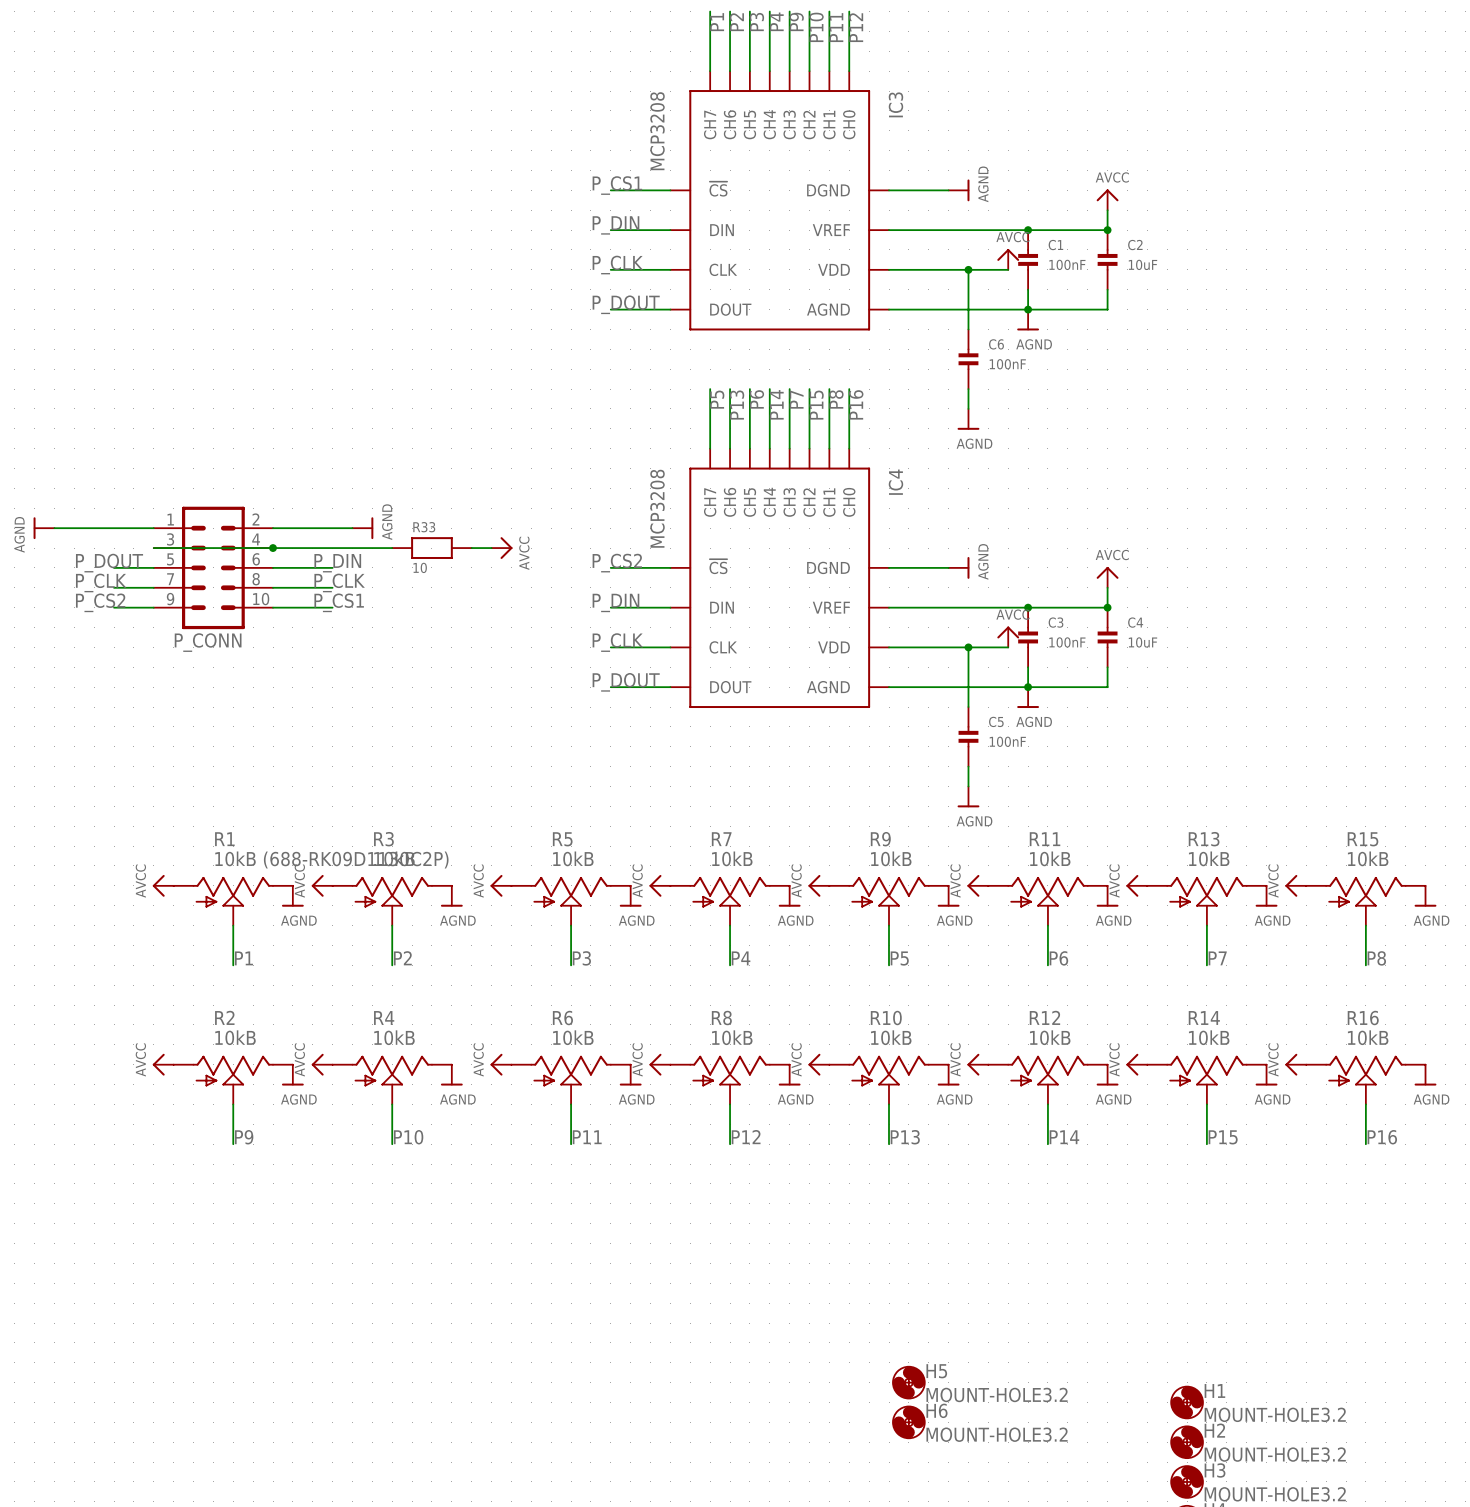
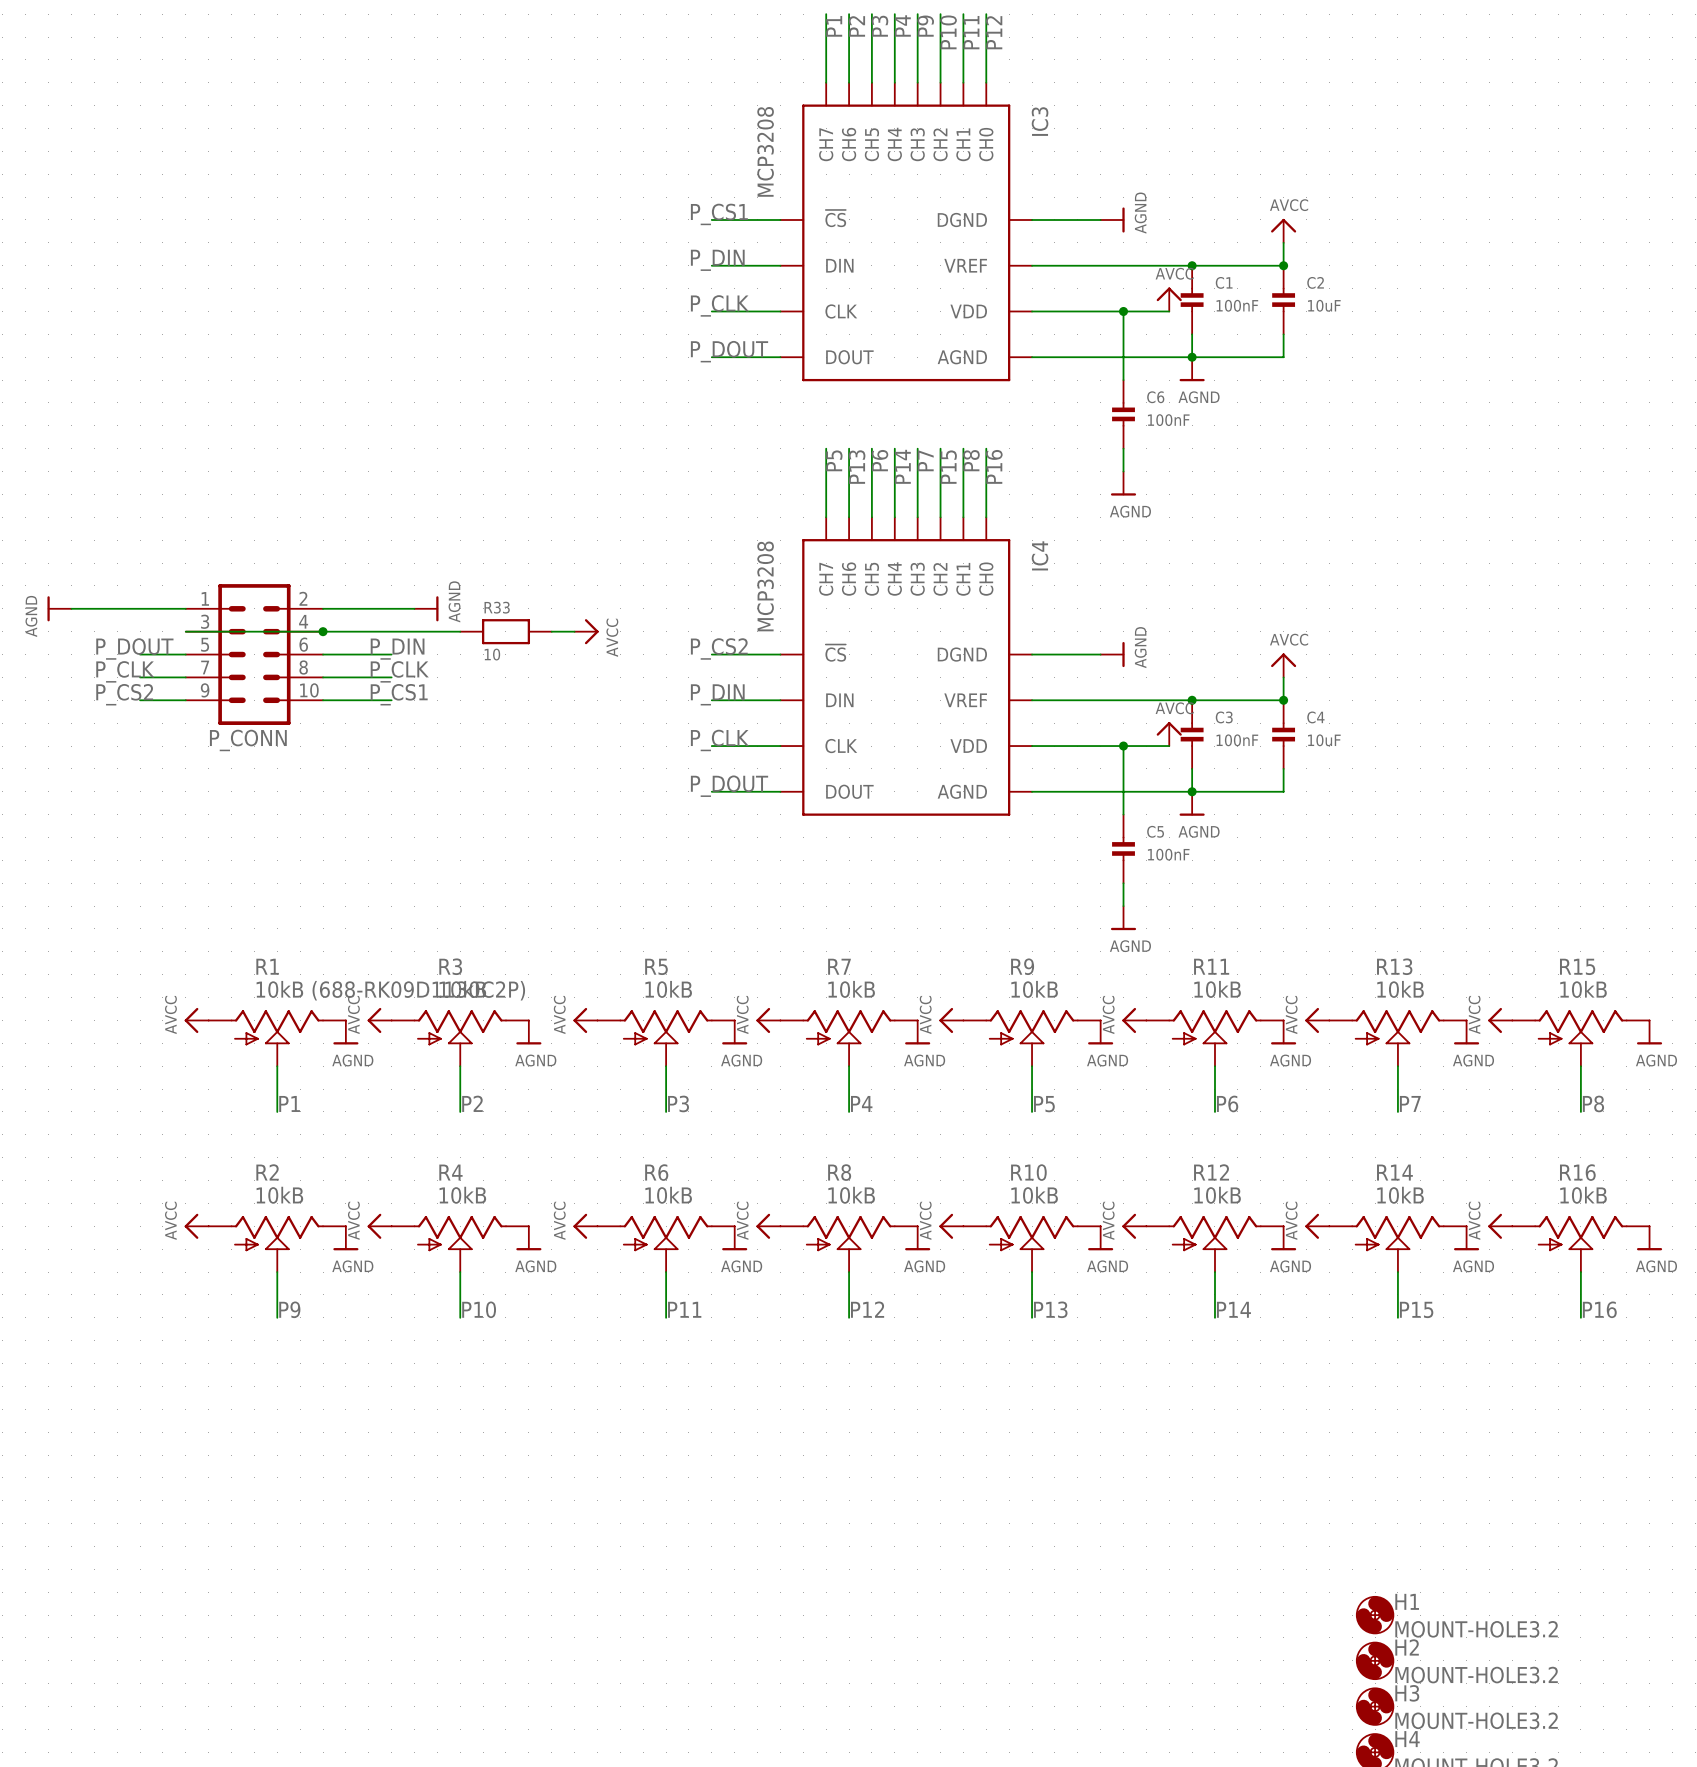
H5: MOUNT-HOLE3.2 (908, 1382) -> none
H6: MOUNT-HOLE3.2 (908, 1422) -> none

